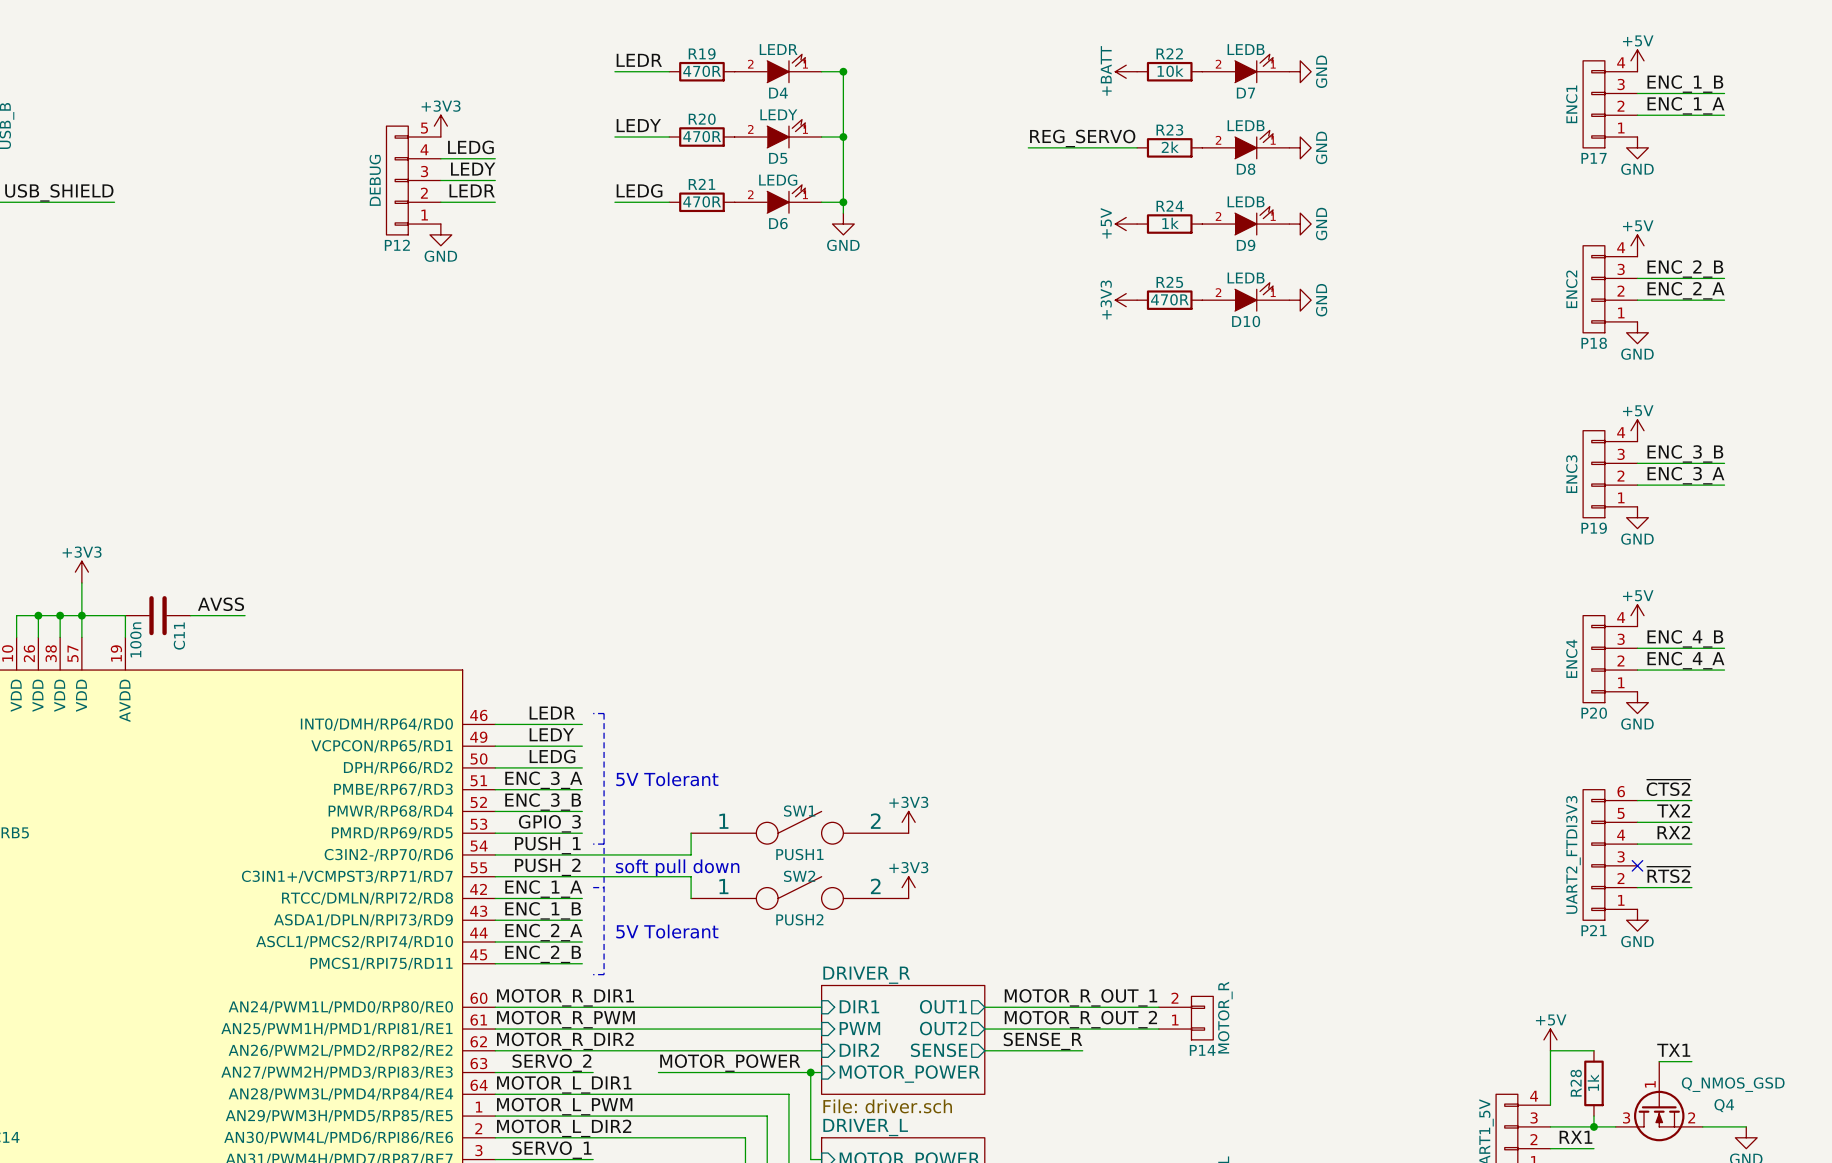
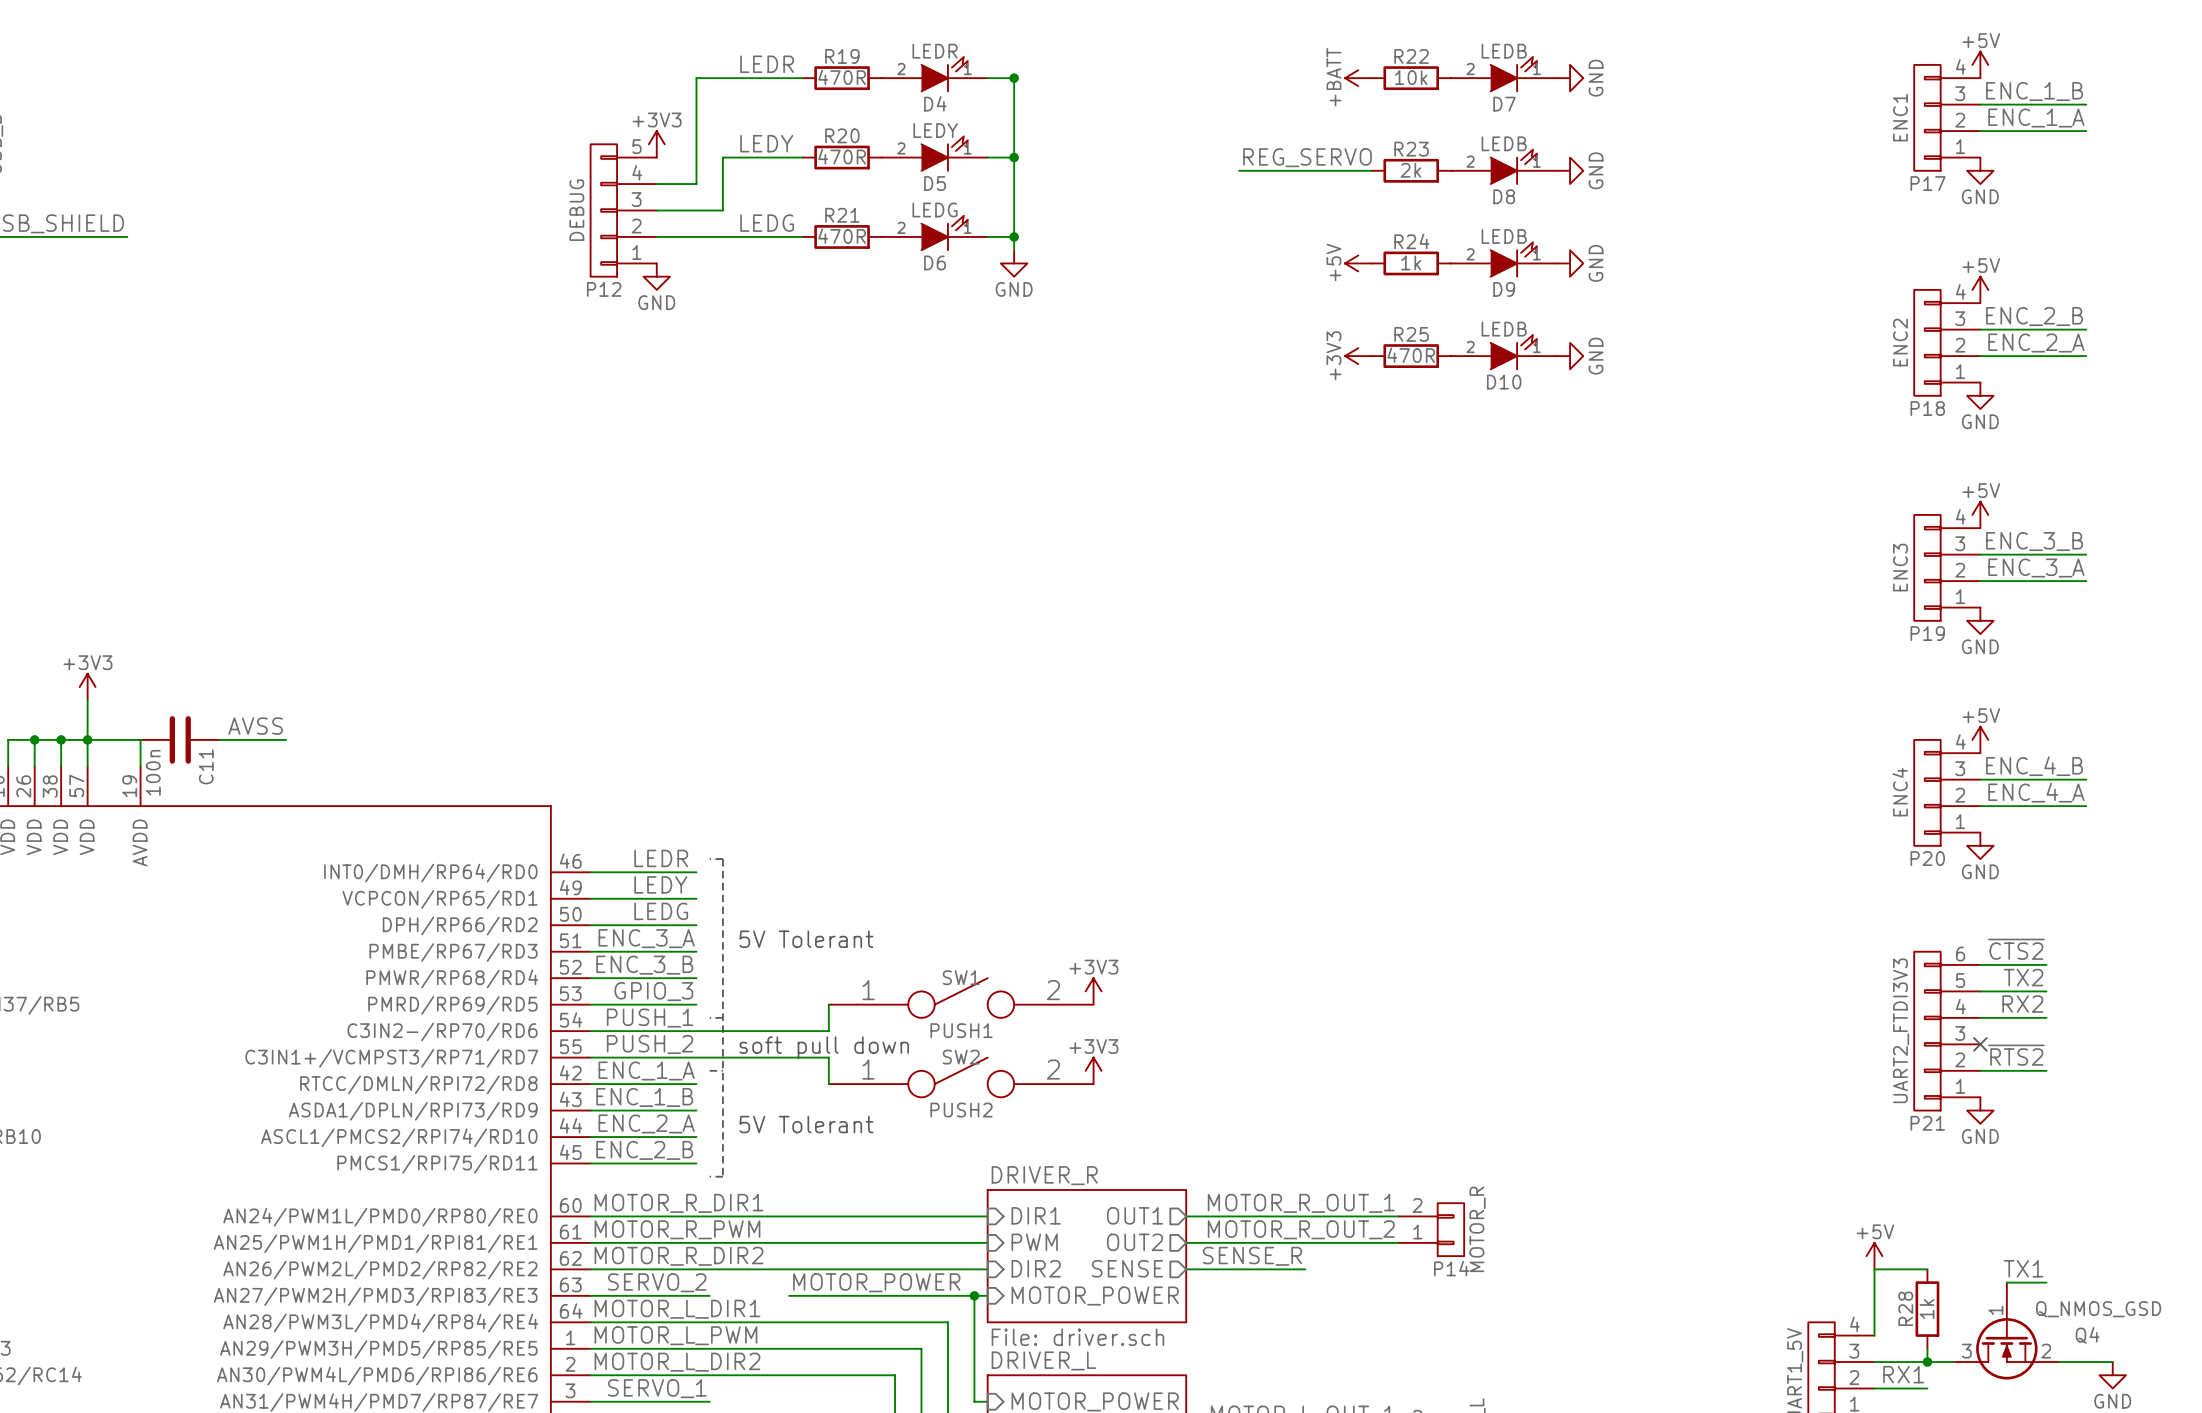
wire: none -> (736, 78) (696, 78) (696, 184) (656, 184)
power symbol position: +3V3 (440, 126) -> +3V3 (656, 144)
wire: none -> (736, 157) (722, 157) (722, 210) (656, 210)
label: LEDG (470, 147) -> none
wire: (440, 158) (495, 158) -> none
label: LEDY (473, 169) -> none
P12 position: (413, 180) -> (623, 210)
wire: (440, 180) (495, 180) -> none
label: LEDR (472, 190) -> none
wire: (440, 202) (495, 202) -> none
wire: none -> (656, 236) (736, 236)
power symbol position: GND (440, 234) -> GND (656, 276)

